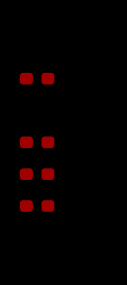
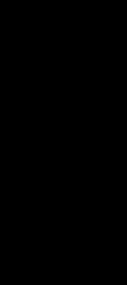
part: (37, 78) -> none
part: (37, 142) -> none
part: (37, 174) -> none
part: (37, 206) -> none

